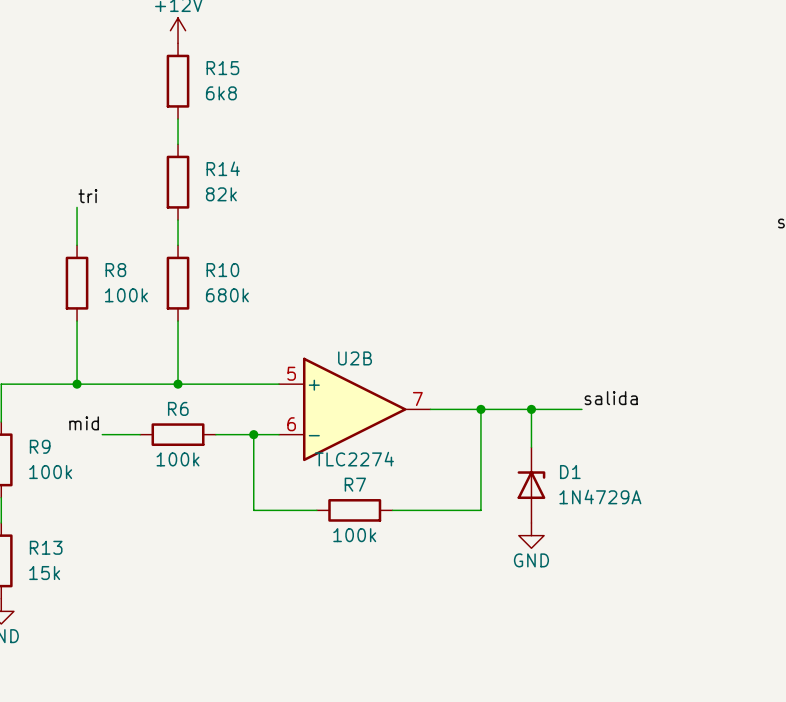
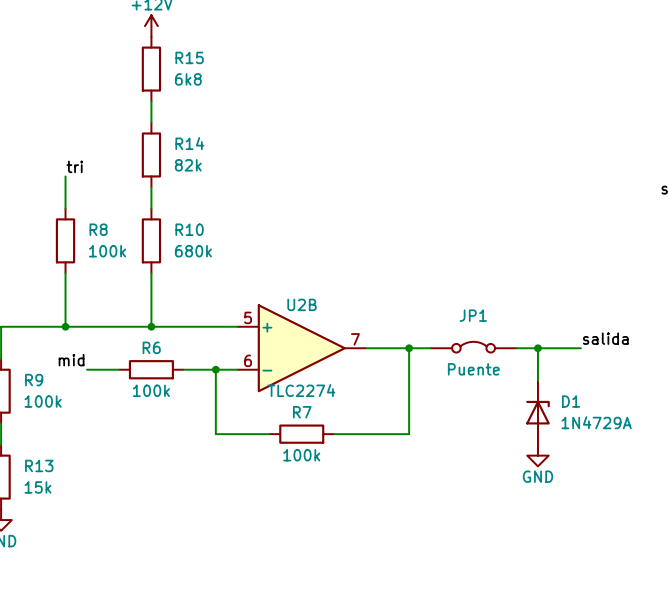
label position: salida (611, 398) -> salida (605, 338)
JP1: none -> Puente (473, 347)
wire: (506, 409) (581, 409) -> (516, 348) (580, 348)
wire: (531, 409) (531, 447) -> (537, 348) (537, 380)
junction: (531, 409) -> none
junction: none -> (537, 348)
D1 position: (531, 485) -> (537, 412)
power symbol position: GND (531, 535) -> GND (537, 455)

